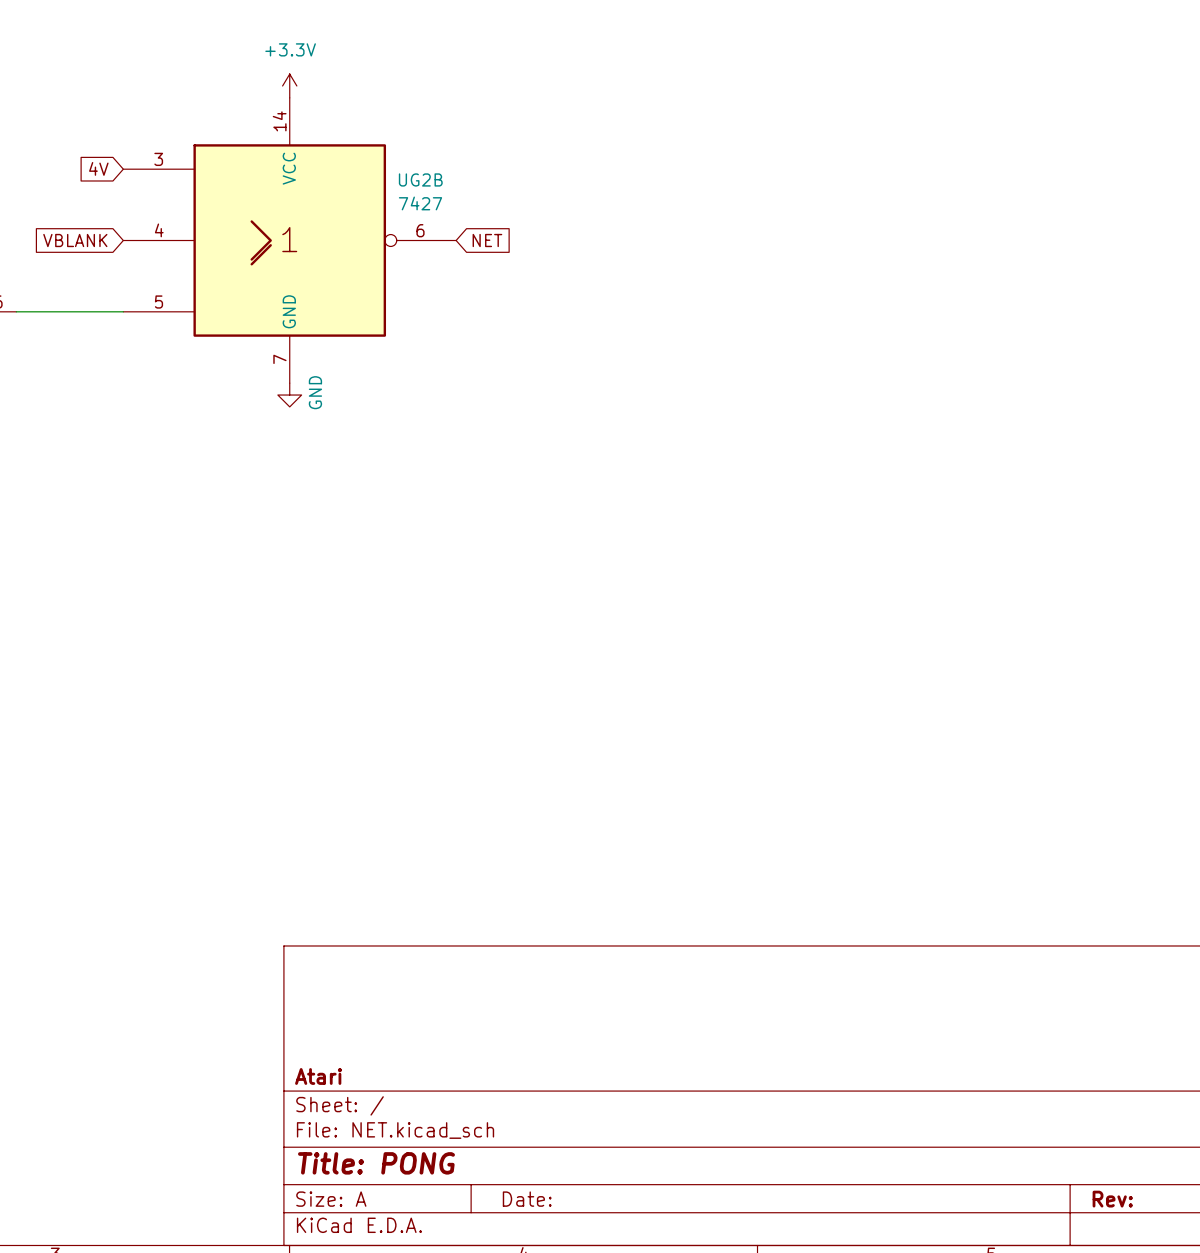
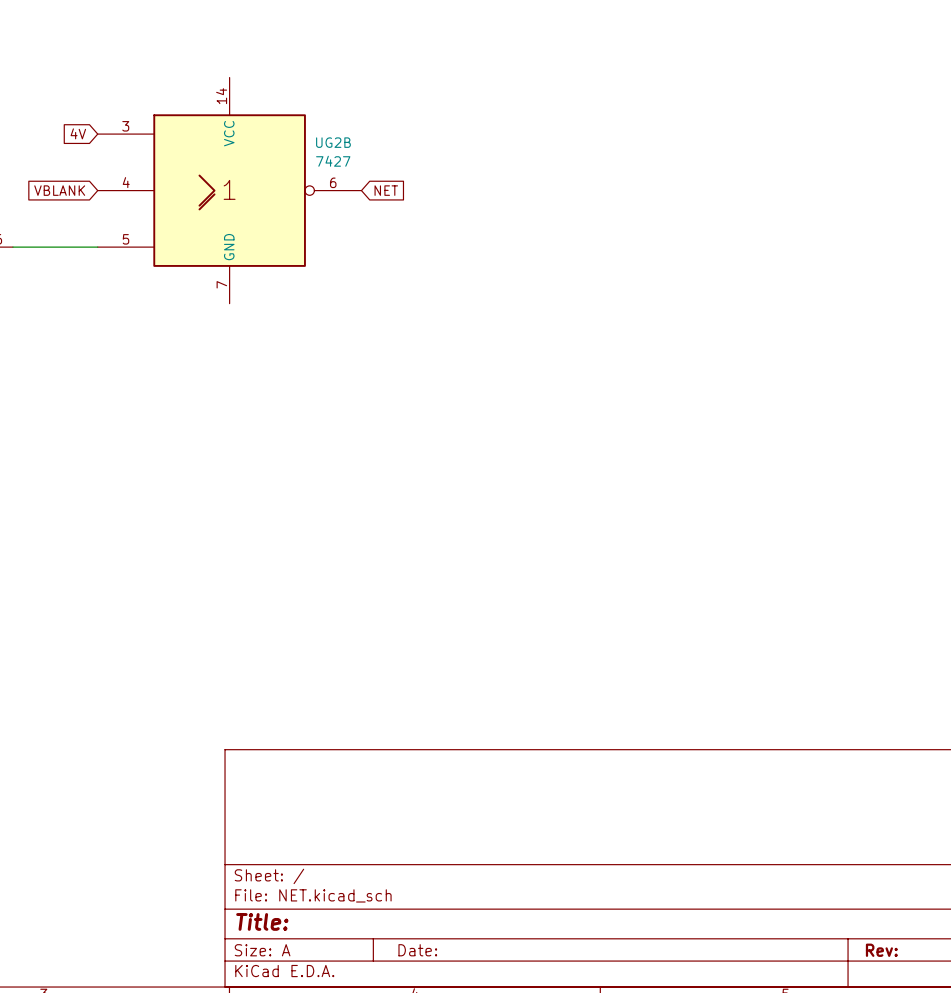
power symbol: +3.3V (289, 85) -> none
power symbol: GND (289, 395) -> none
title block: Atari (318, 1076) -> none
title block: Title: PONG (376, 1163) -> Title: (262, 921)

